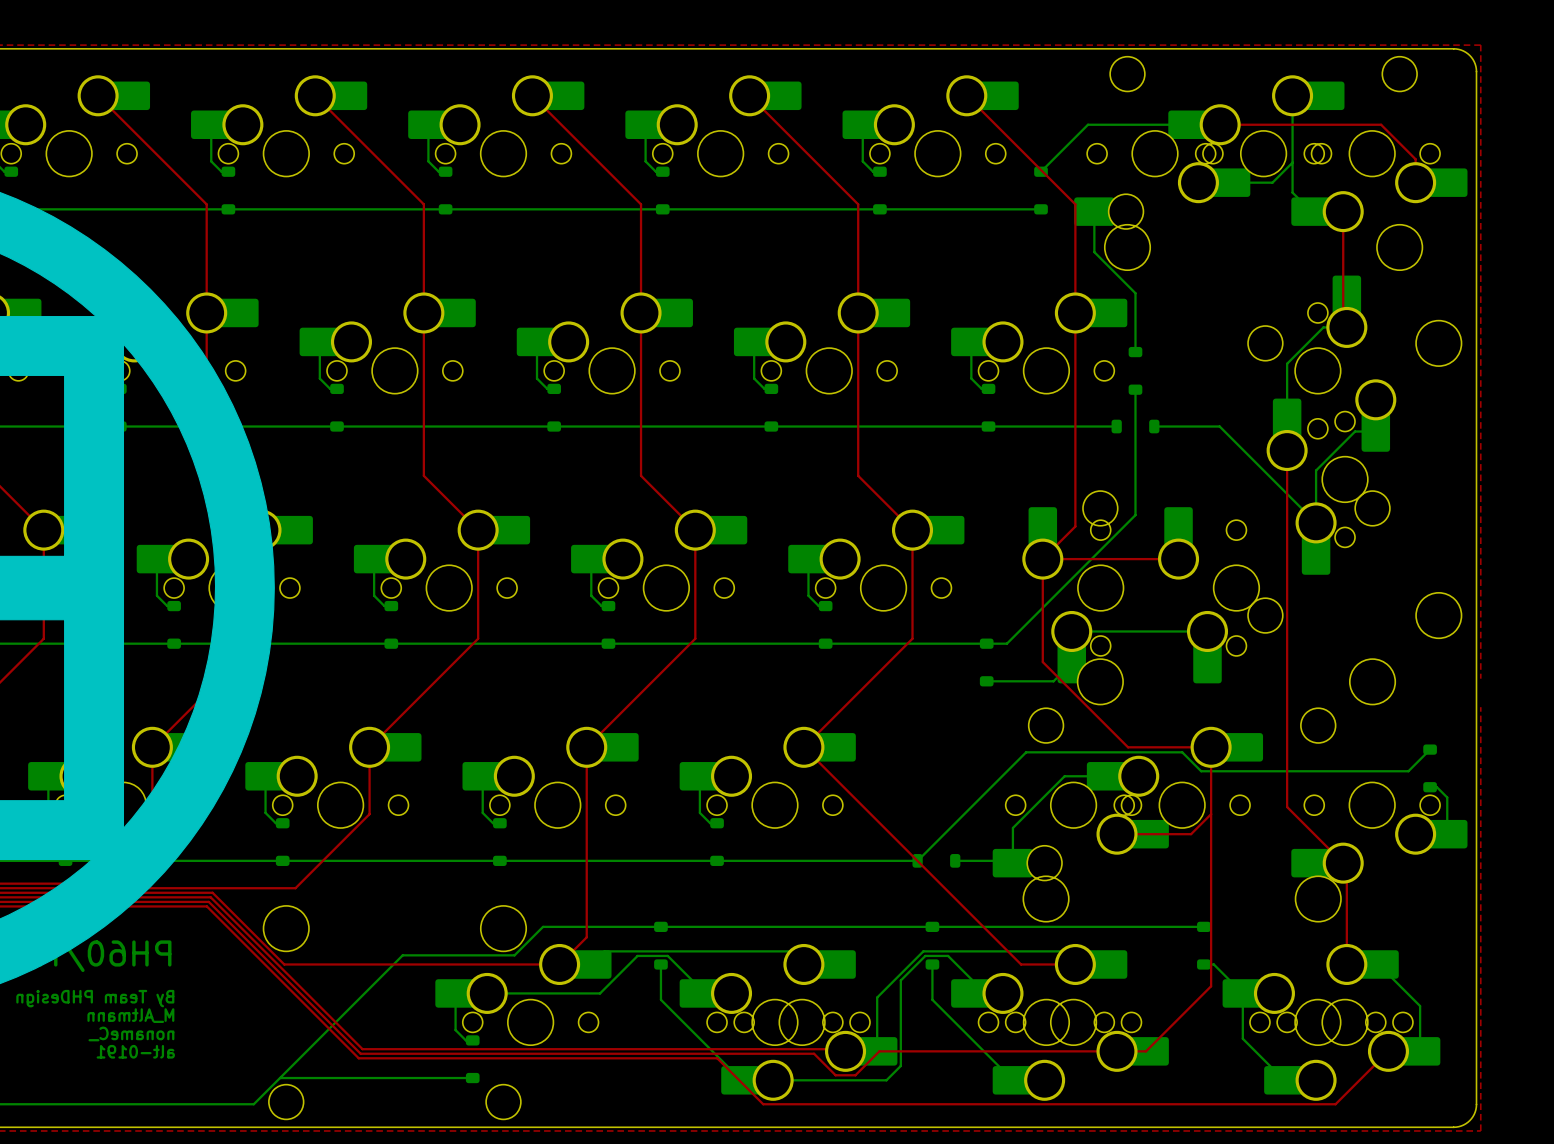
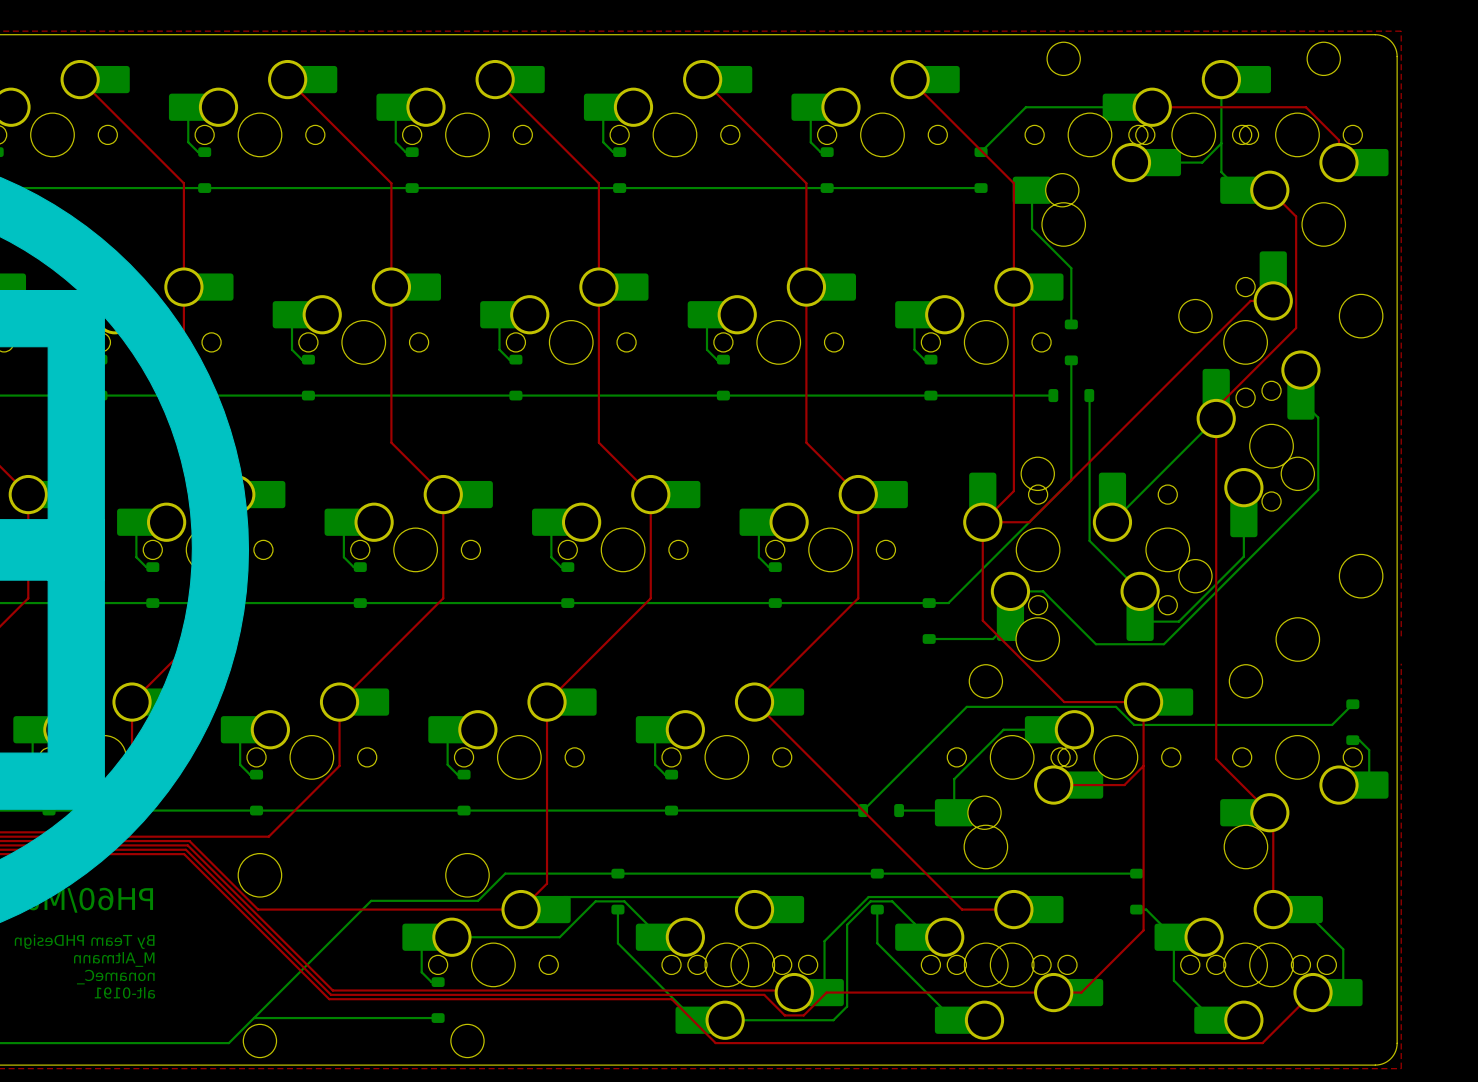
top track: (1343, 211) (1343, 323) (1346, 327) -> (1269, 190) (1296, 216) (1296, 328) (1216, 408) (1216, 418)
bottom track: (1346, 327) (1323, 327) (1287, 363) (1287, 418) -> none
bottom track: (1154, 426) (1219, 426) (1316, 522) (1316, 470) (1355, 431) (1375, 431) -> (1043, 591) (1095, 644) (1163, 644) (1318, 489) (1318, 417) (1300, 400)
bottom track: none -> (1216, 418) (1112, 522)
bottom track: none -> (1243, 517) (1243, 556) (1178, 621) (1140, 621)
top track: (1091, 559) (1178, 559) -> (1029, 522) (1250, 300) (1273, 300)
bottom track: (1105, 631) (1207, 631) -> (1089, 395) (1089, 540) (1140, 591)

